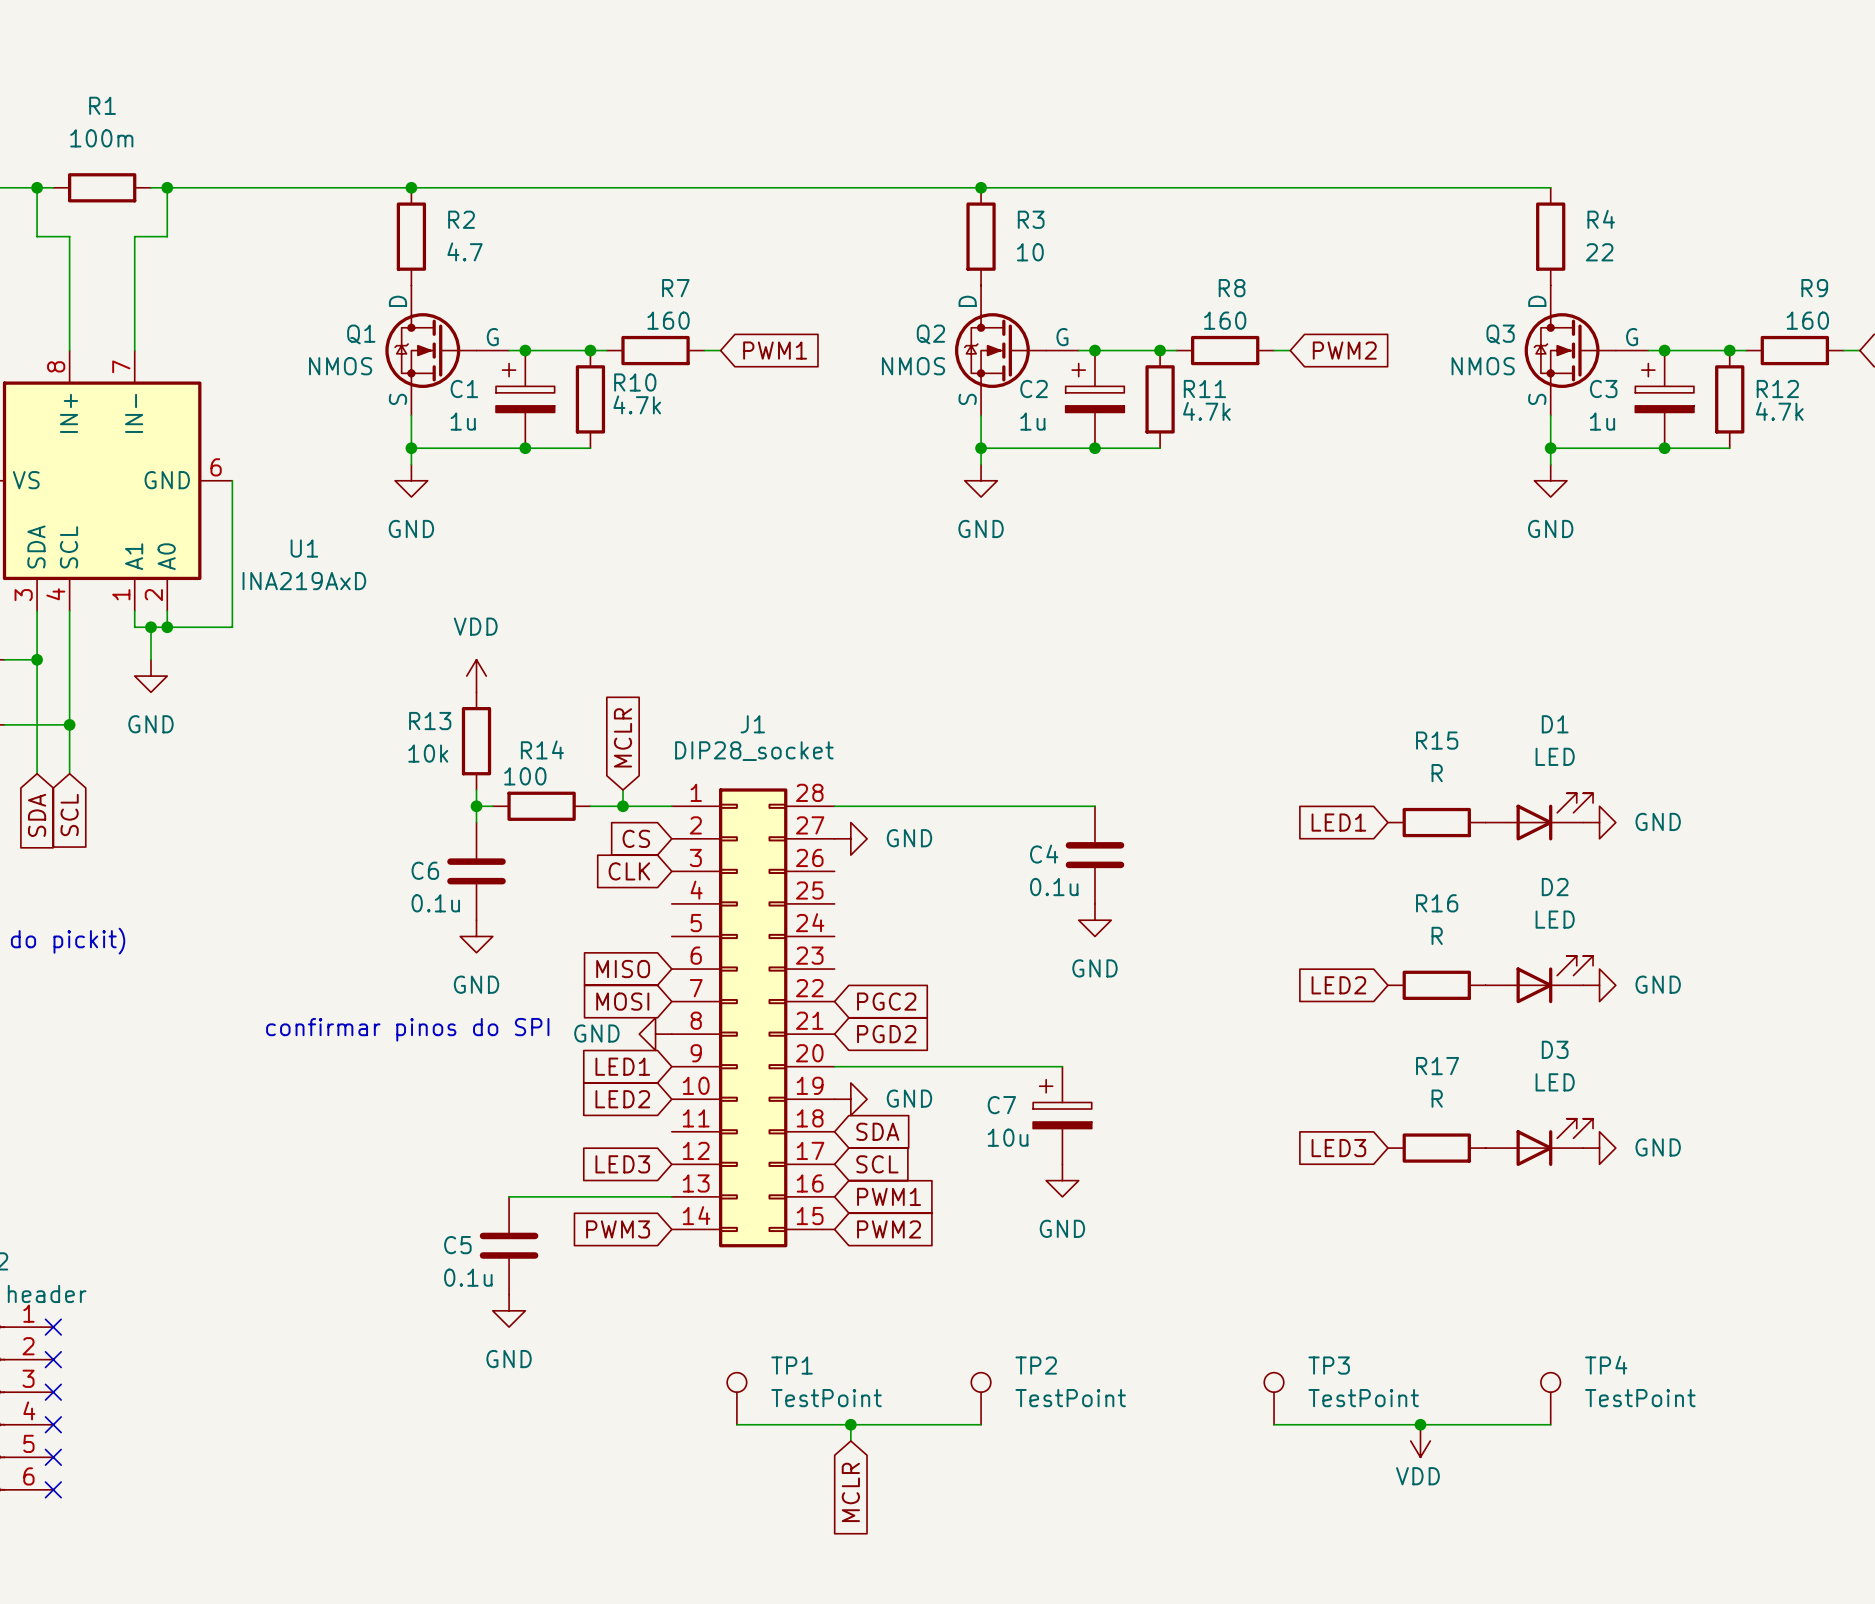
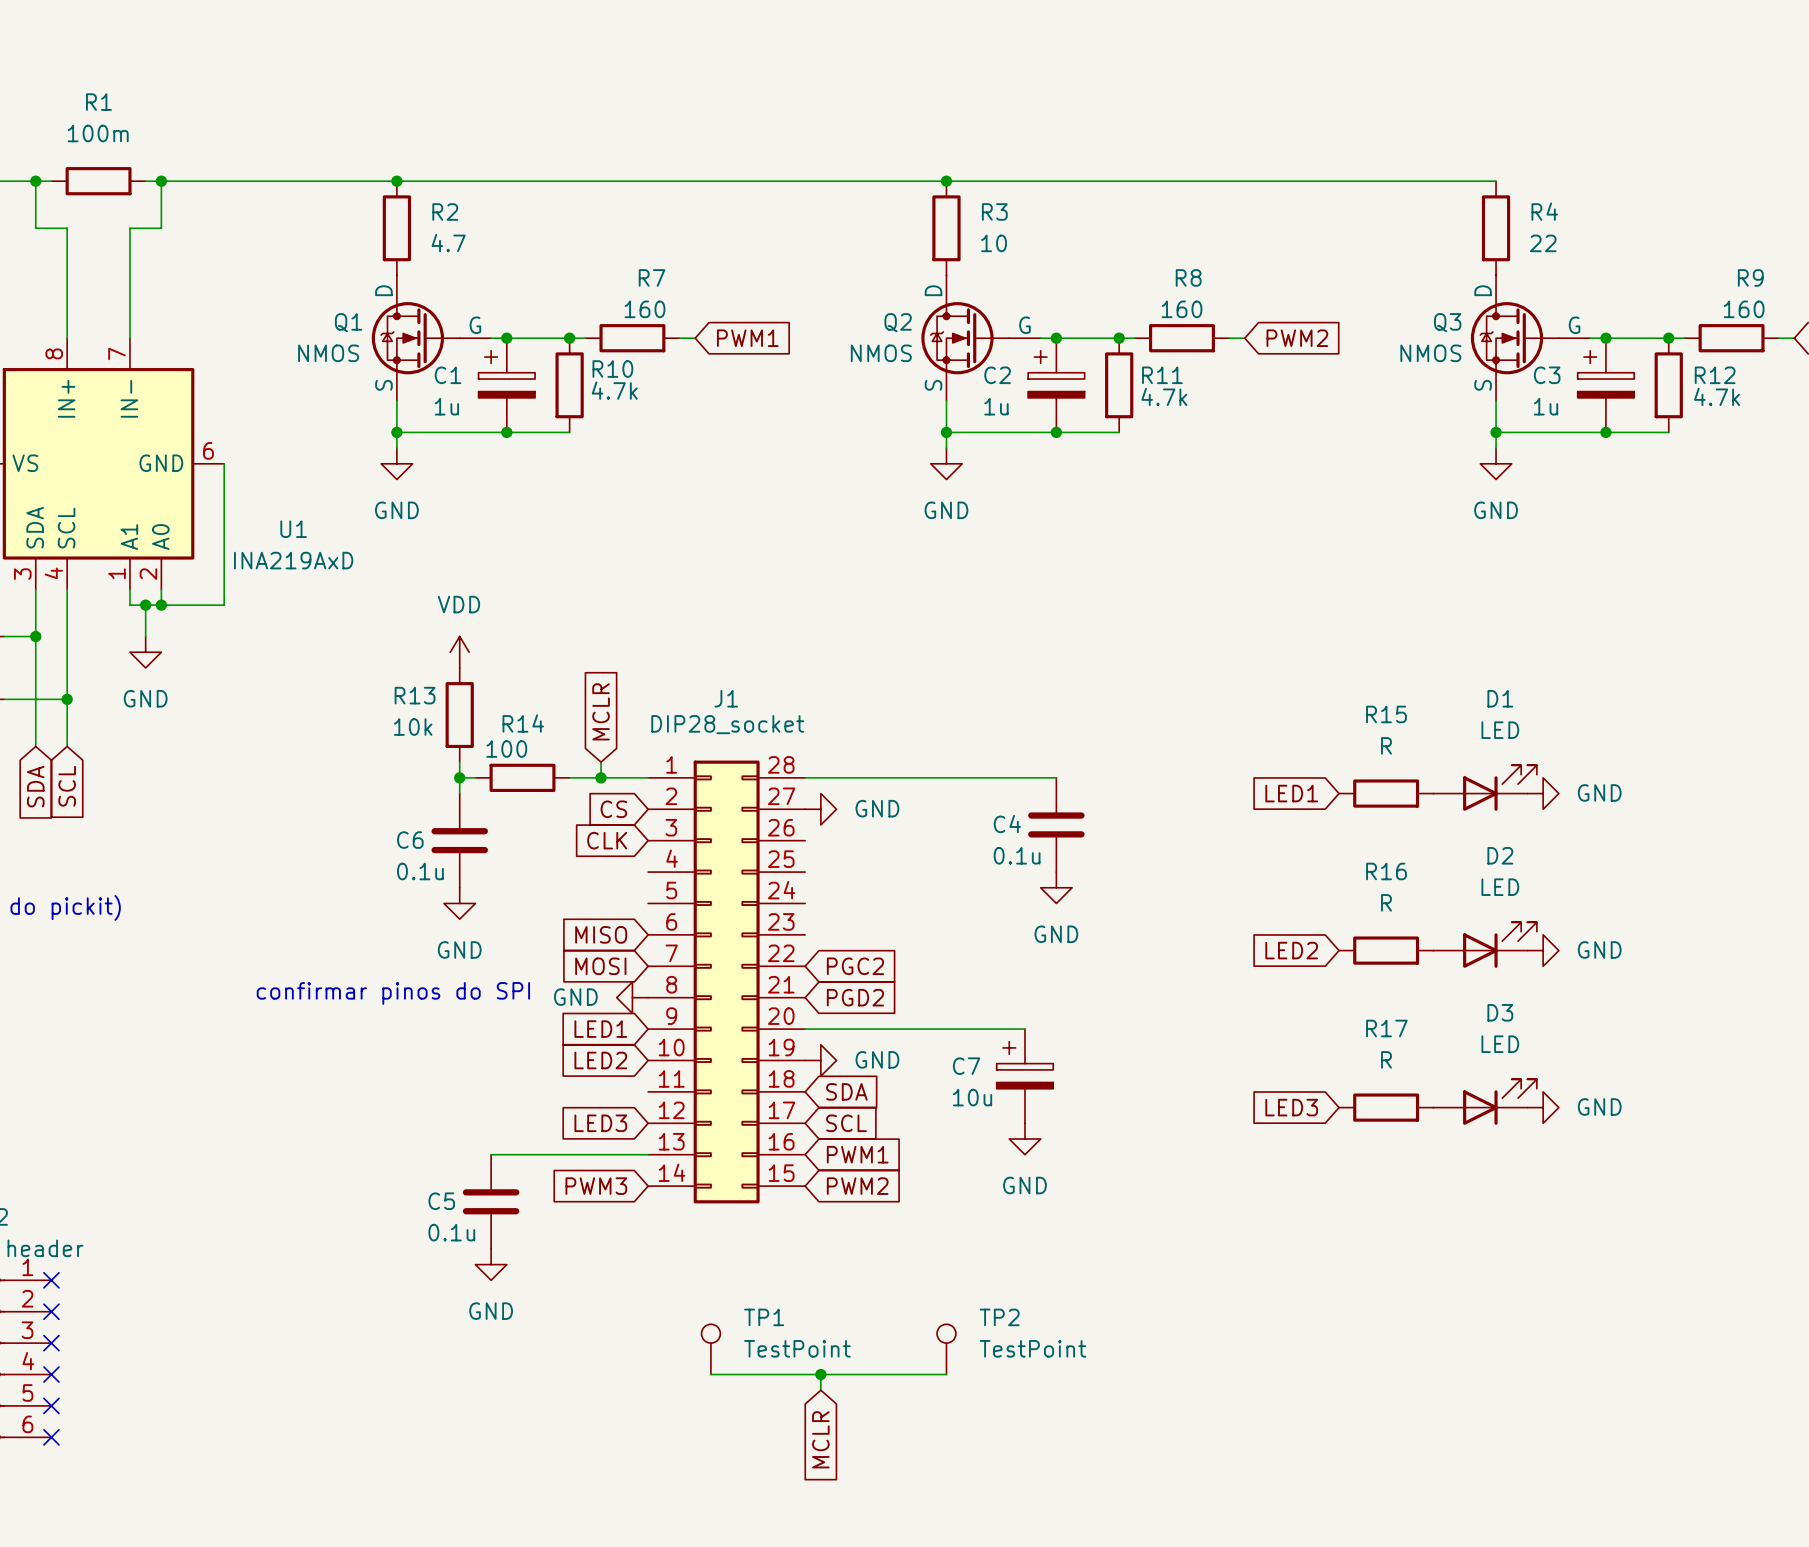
TP3: TestPoint (1274, 1398) -> none
TP4: TestPoint (1550, 1398) -> none
wire: (1274, 1424) (1550, 1424) -> none
junction: (1420, 1424) -> none
power symbol: VDD (1420, 1441) -> none

